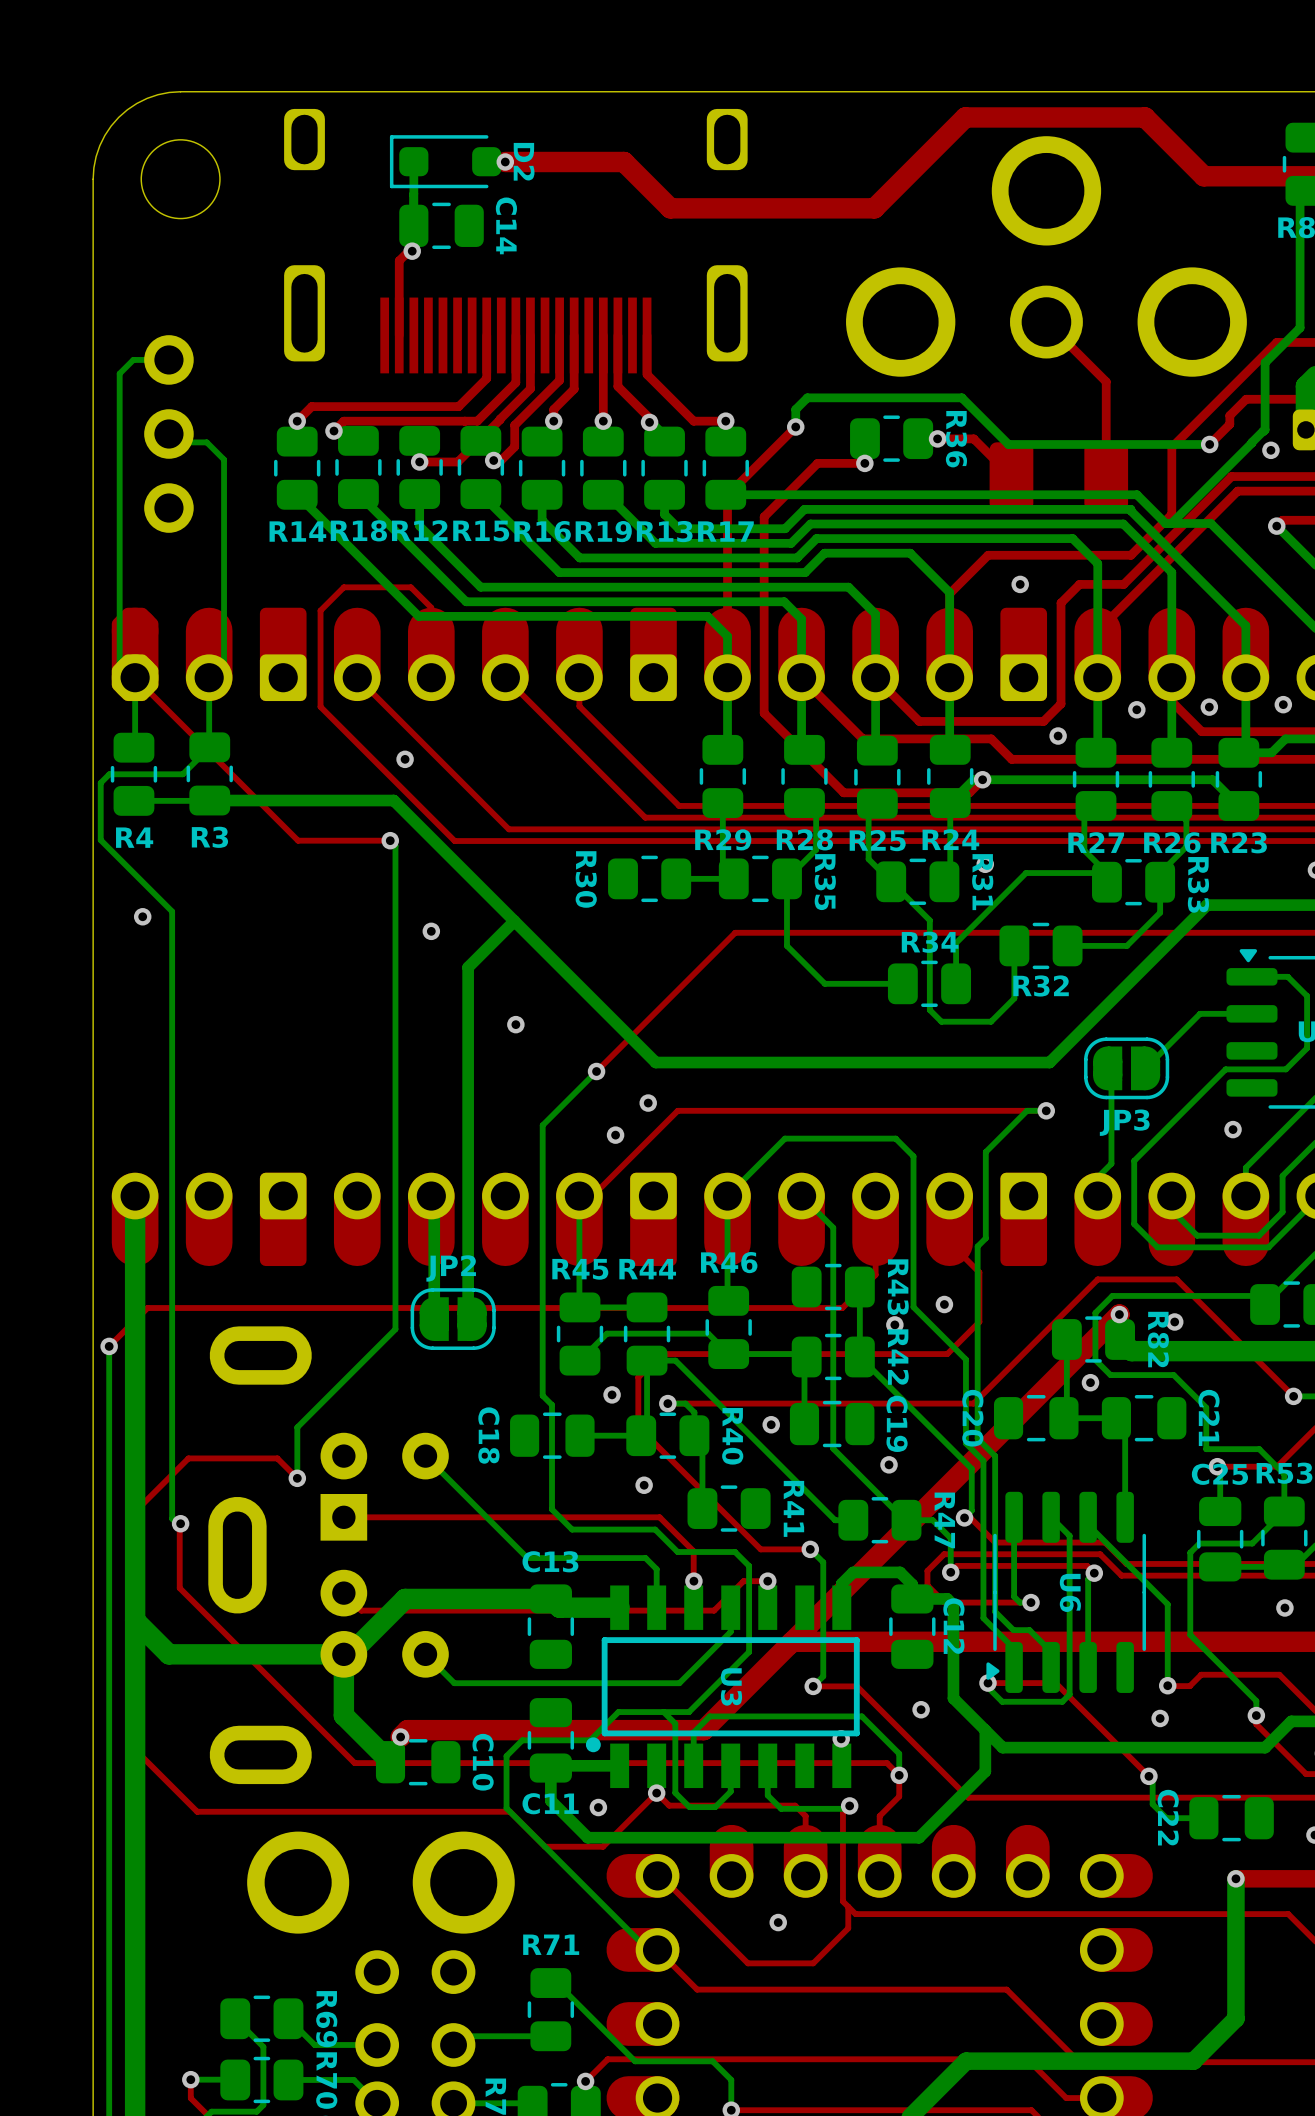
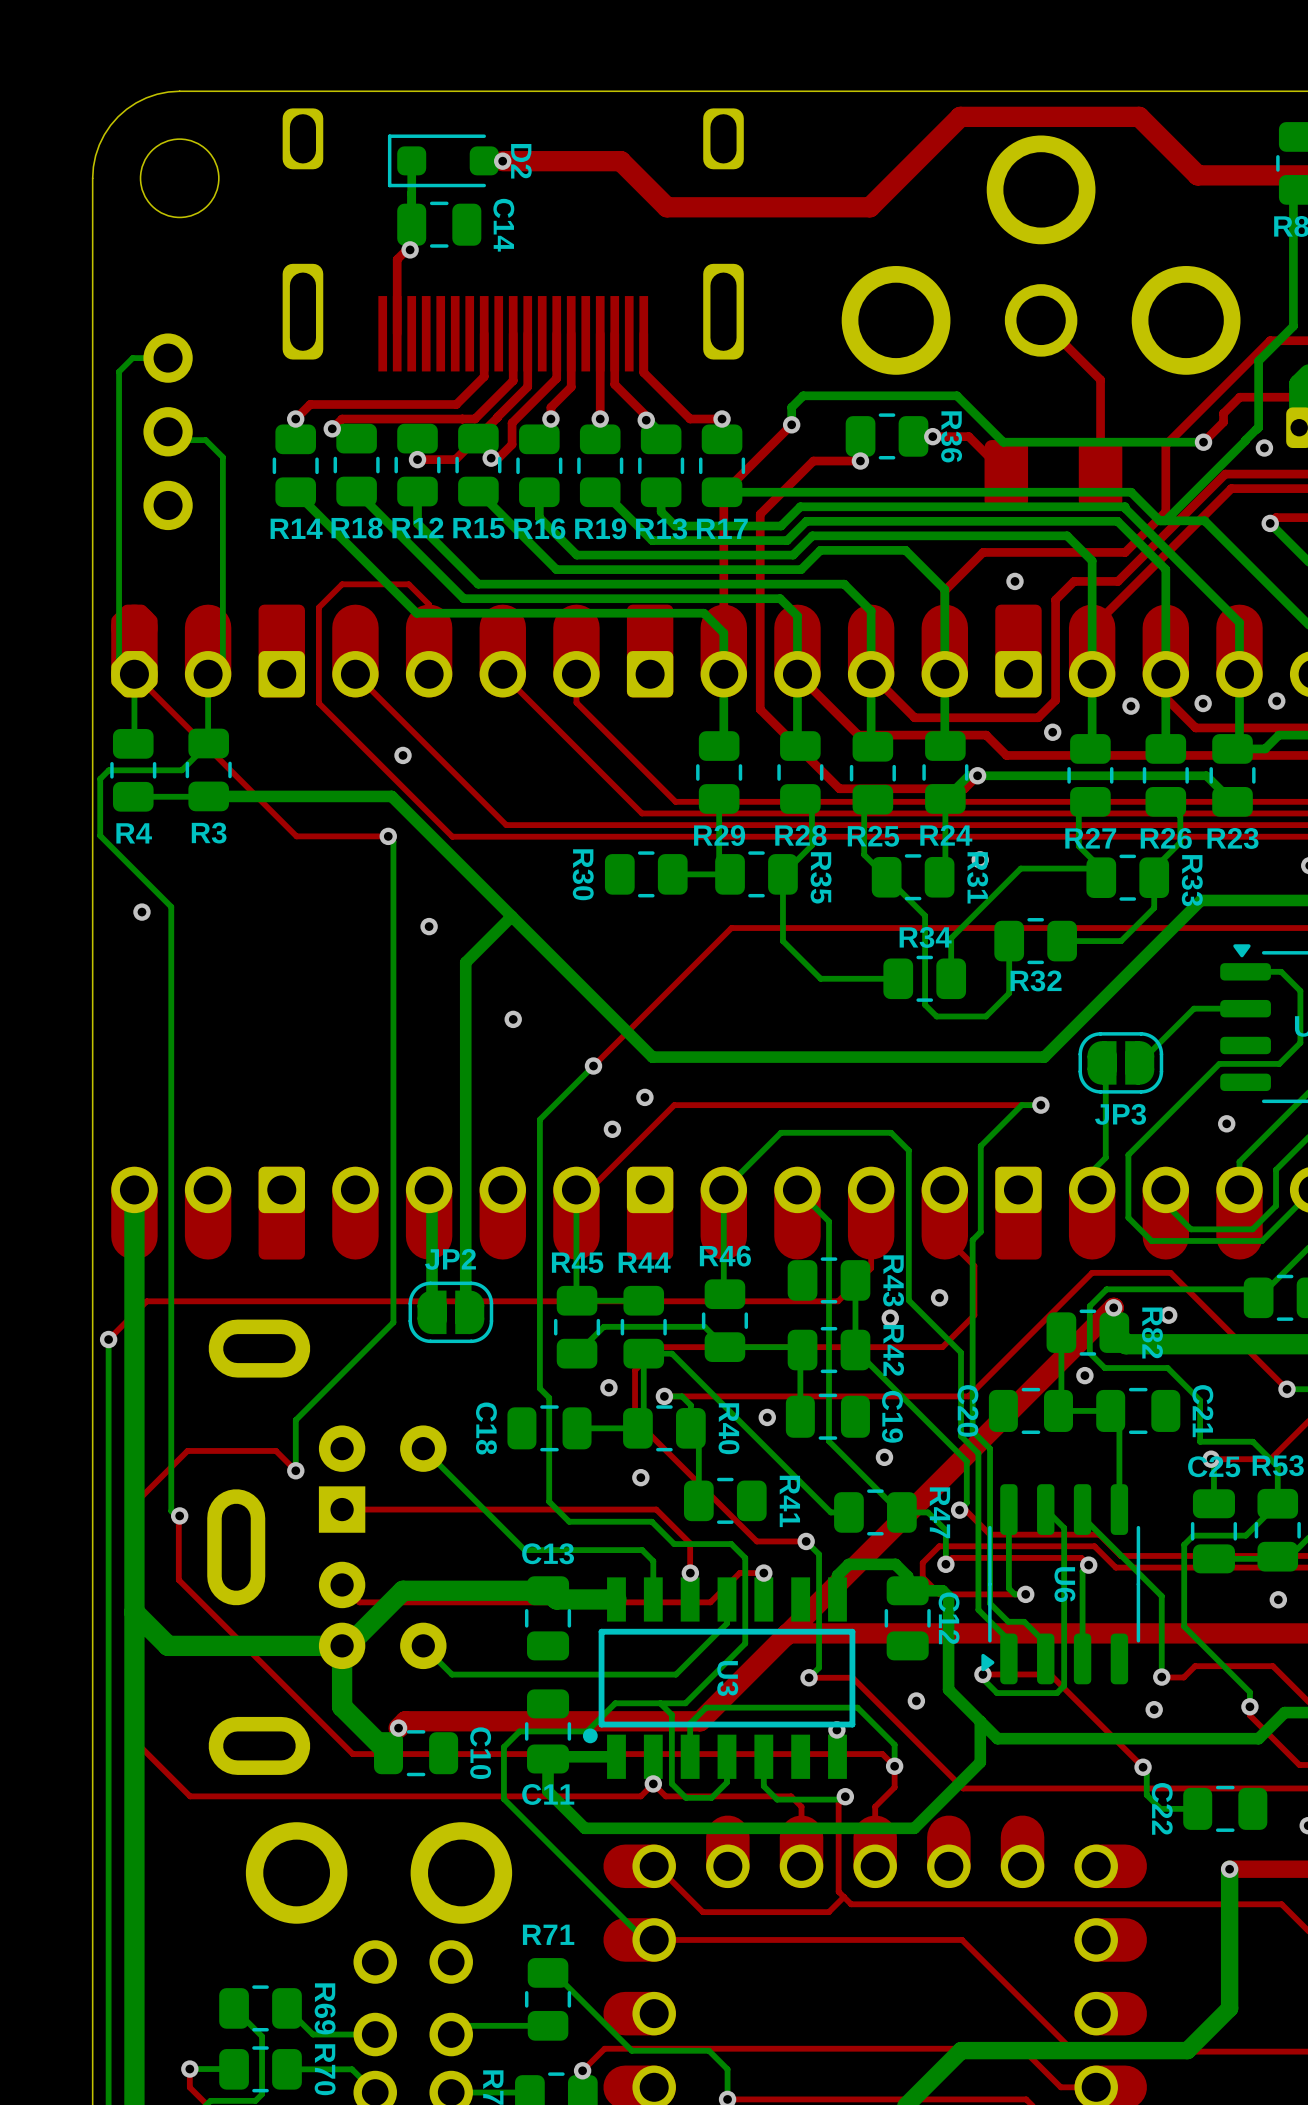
top track: (644, 1805) (603, 1846) (545, 1846) (510, 1811) (197, 1811) (191, 1805) -> (640, 1796) (190, 1796)
via: (598, 1807) -> none
top track: (848, 1906) (848, 1928) (813, 1963) (747, 1963) (706, 1921) -> (843, 1897) (828, 1912) (702, 1912)
via: (778, 1922) -> none
top track: (657, 1949) (697, 1989) (1006, 1989) -> (654, 1939) (962, 1939) (1001, 1979)

